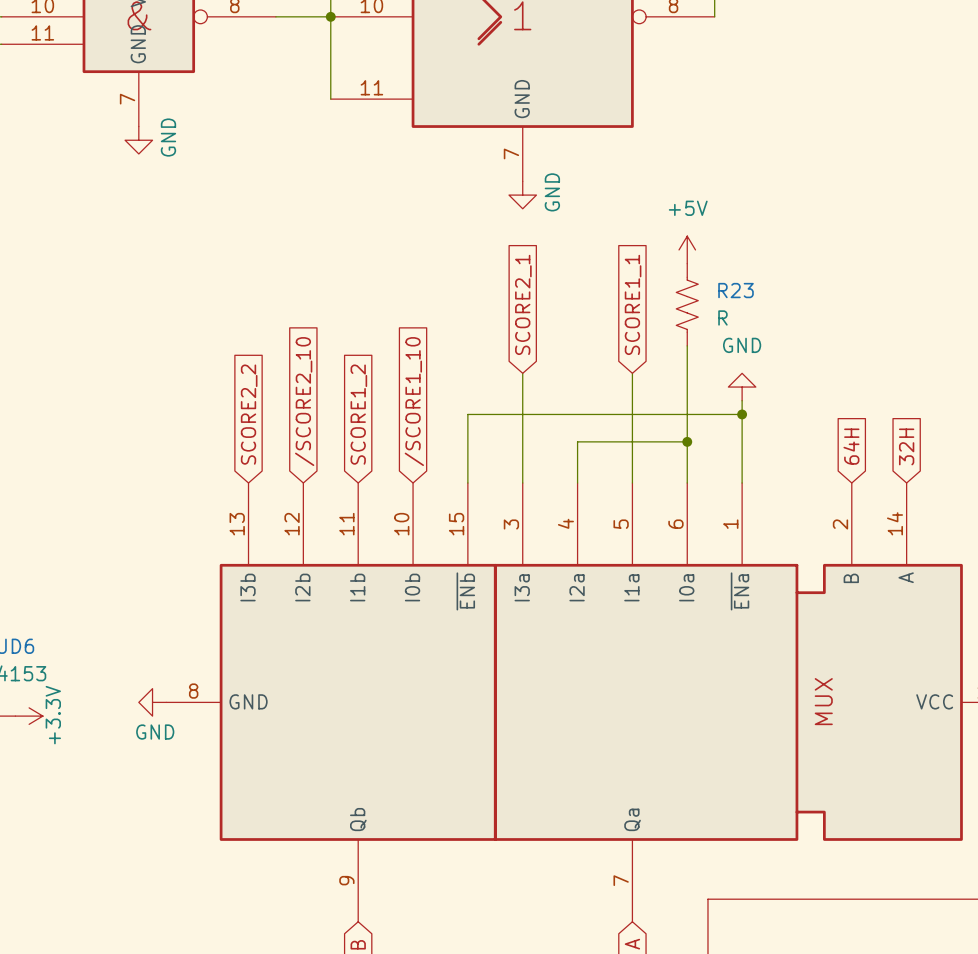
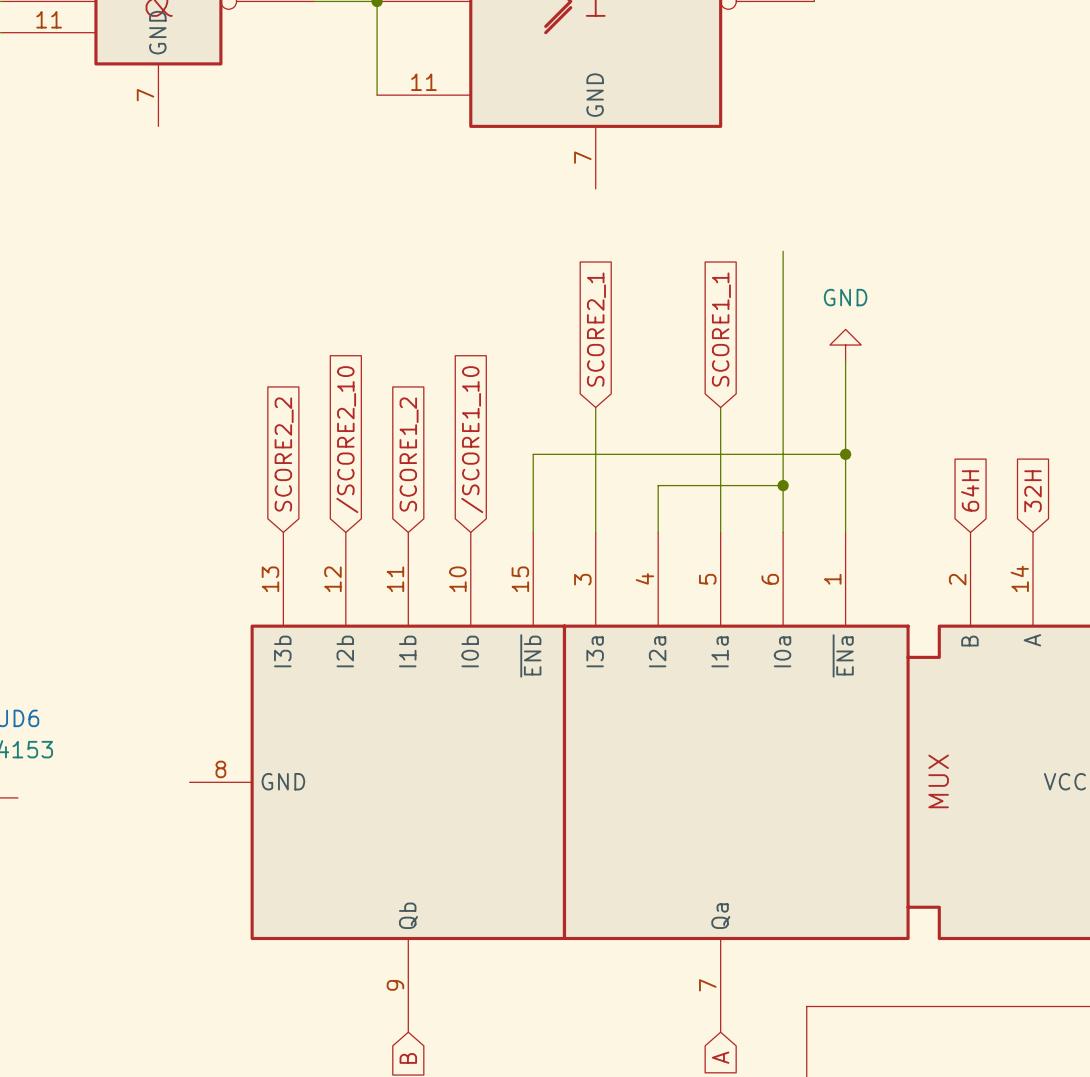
power symbol: GND (138, 140) -> none
power symbol: GND (522, 195) -> none
power symbol: +5V (687, 249) -> none
R23: R (687, 304) -> none
wire: none -> (845, 360) (845, 438)
power symbol position: GND (742, 387) -> GND (845, 345)
power symbol: GND (152, 702) -> none
power symbol: +3.3V (29, 716) -> none

